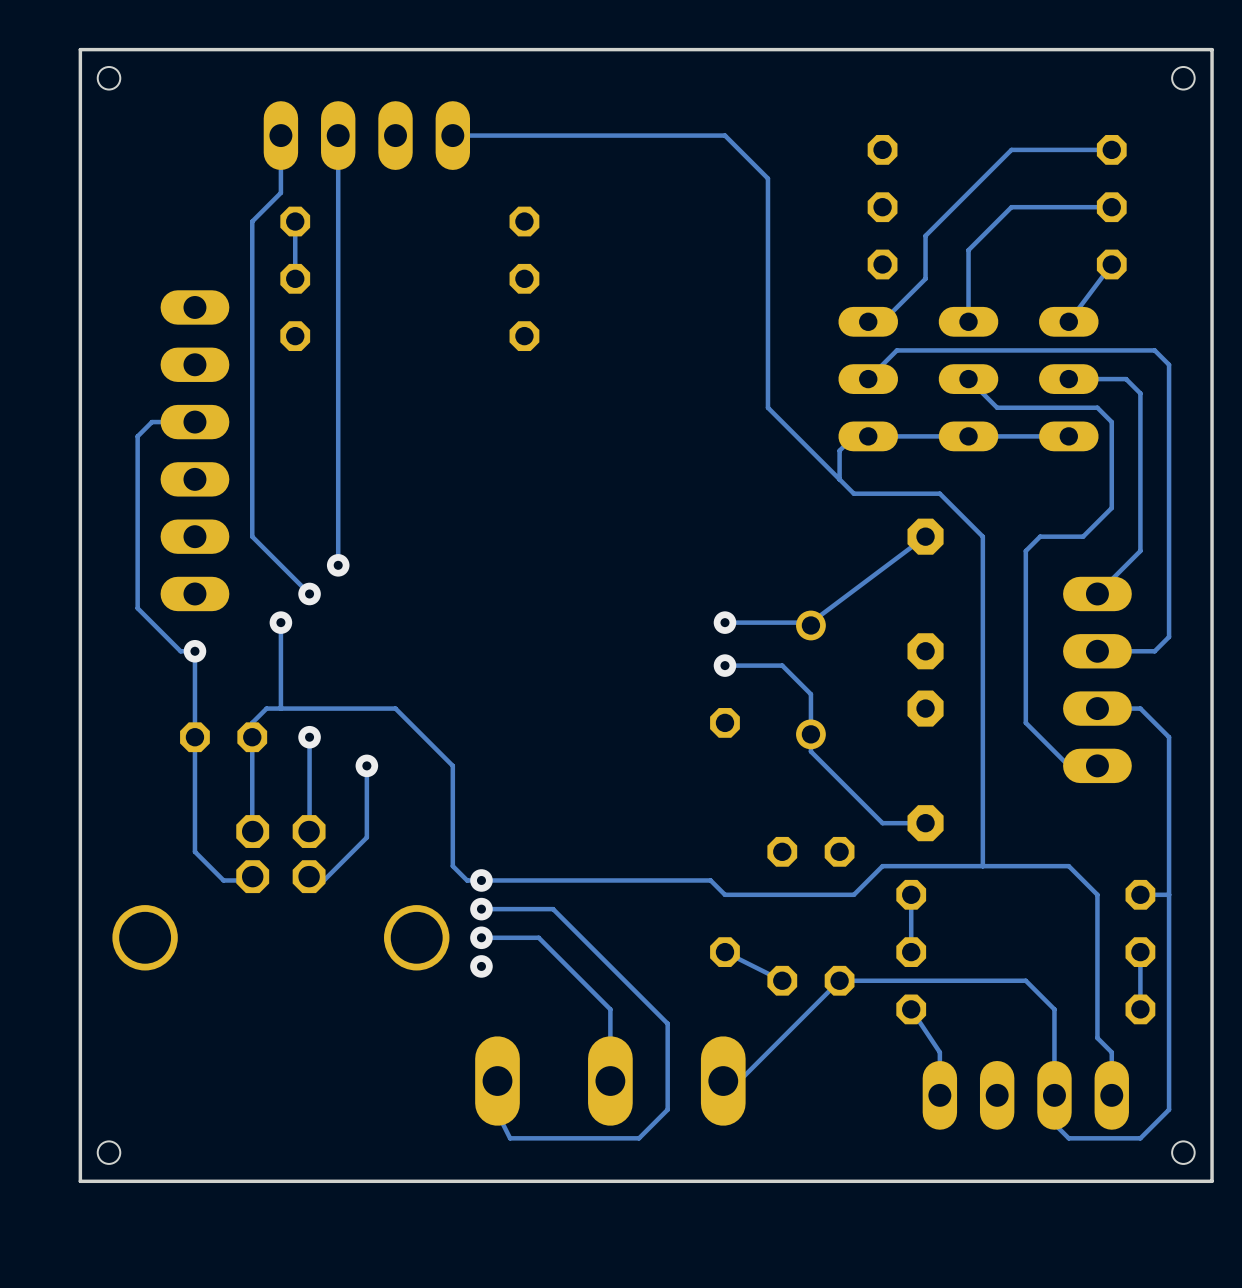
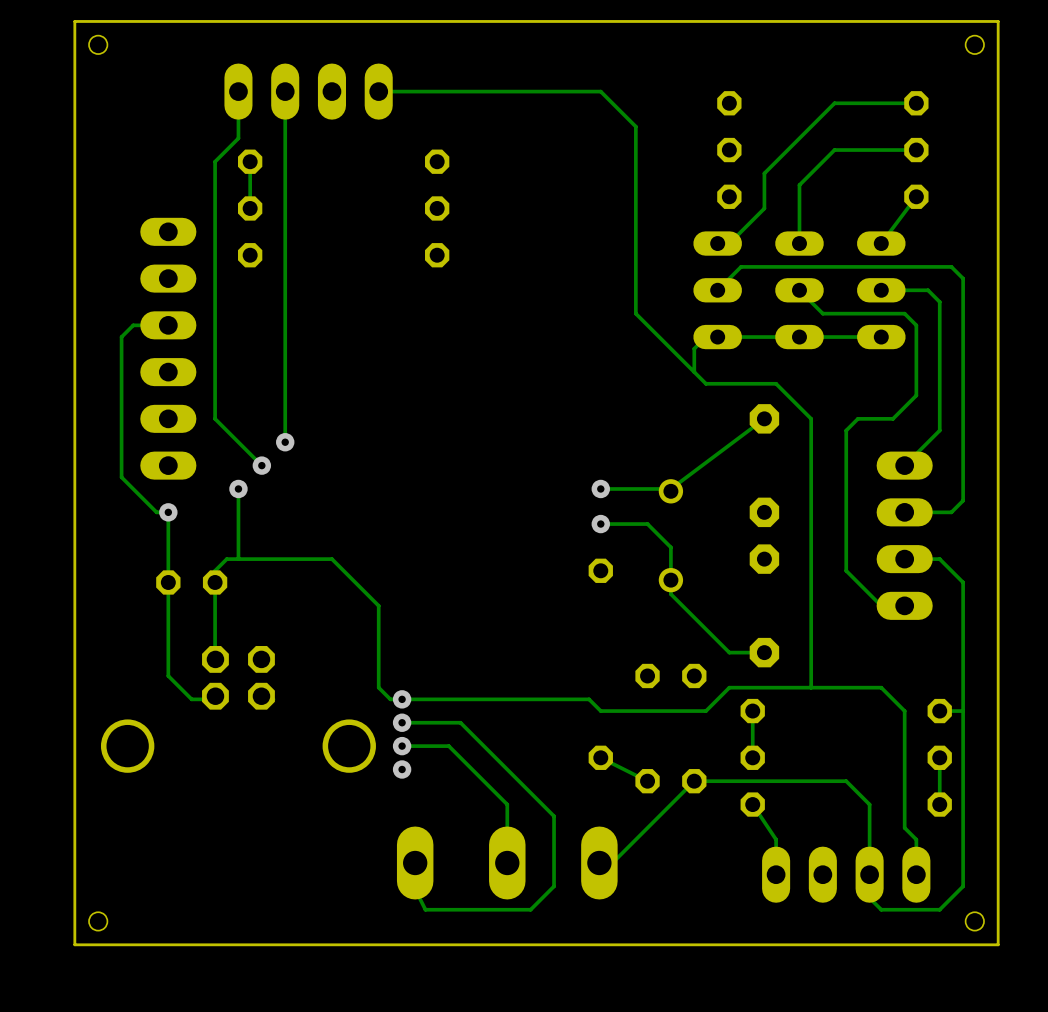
track: (309, 737) (309, 837) -> none
via: (309, 737) -> none
track: (366, 765) (366, 837) (323, 880) -> none
via: (366, 765) -> none

